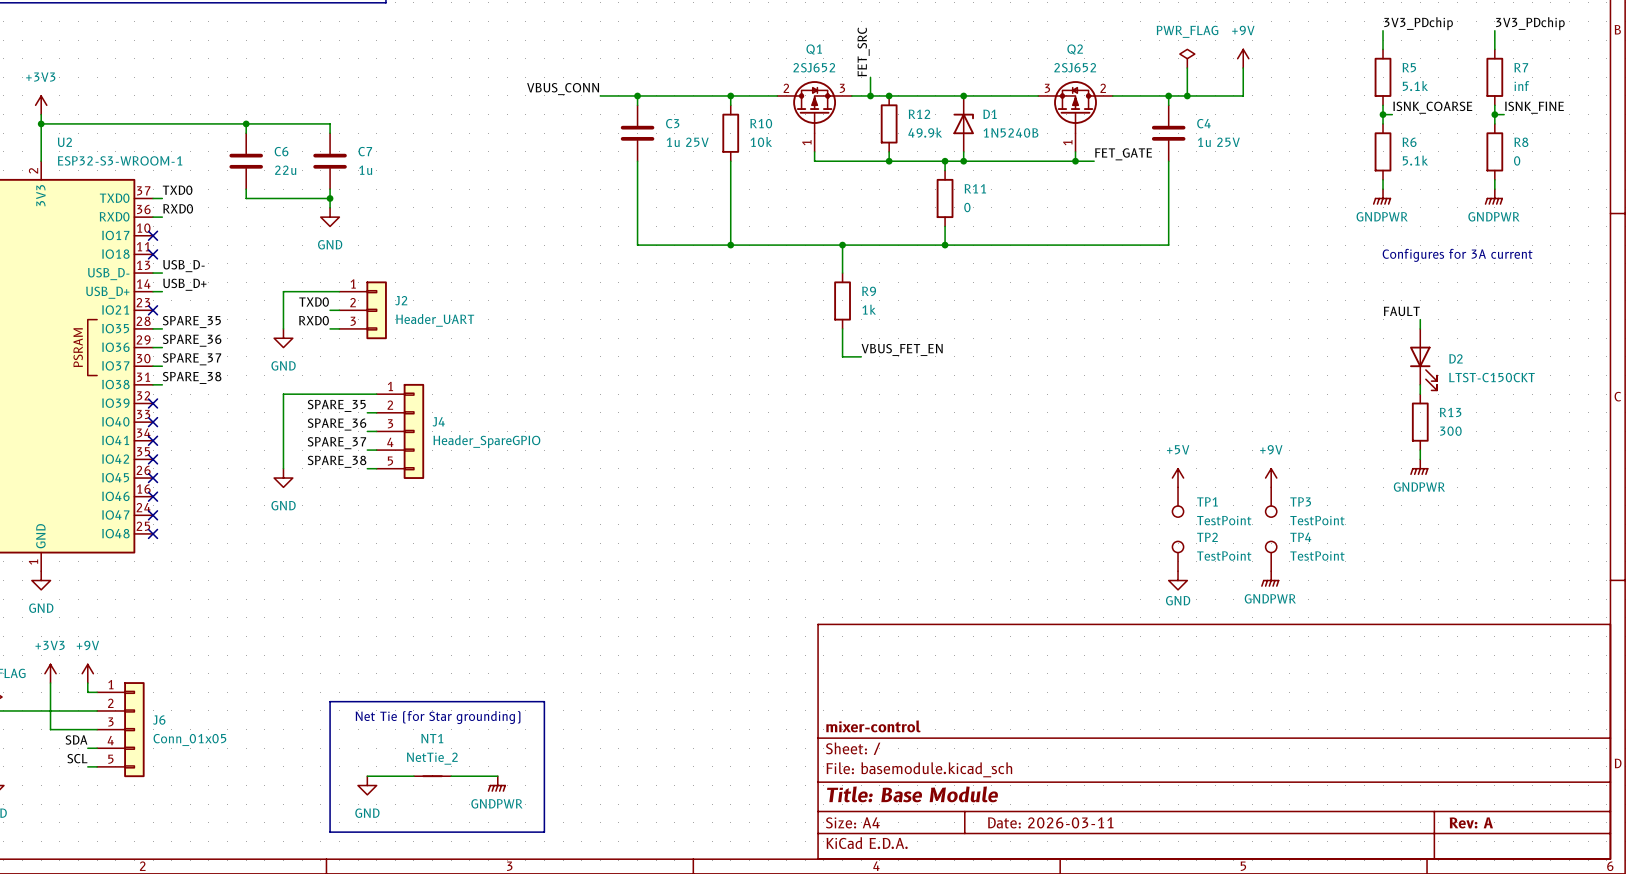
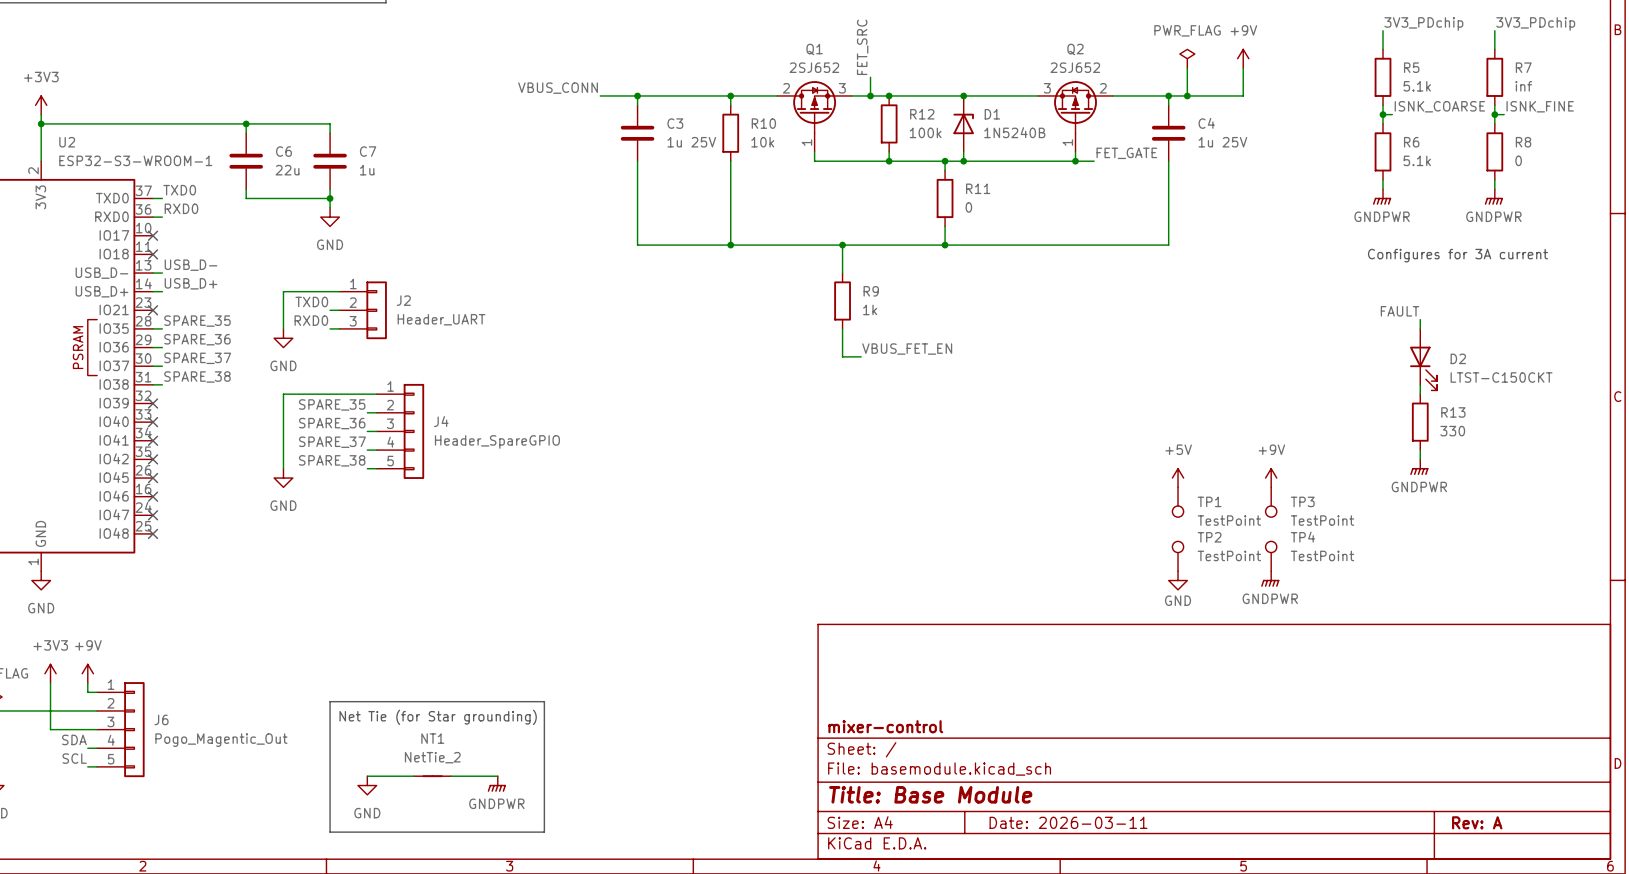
R12 value: 49.9k (925, 132) -> 100k (925, 132)
R13 value: 300 (1450, 431) -> 330 (1452, 431)
J6 value: Conn_01x05 (189, 739) -> Pogo_Magentic_Out (221, 740)

